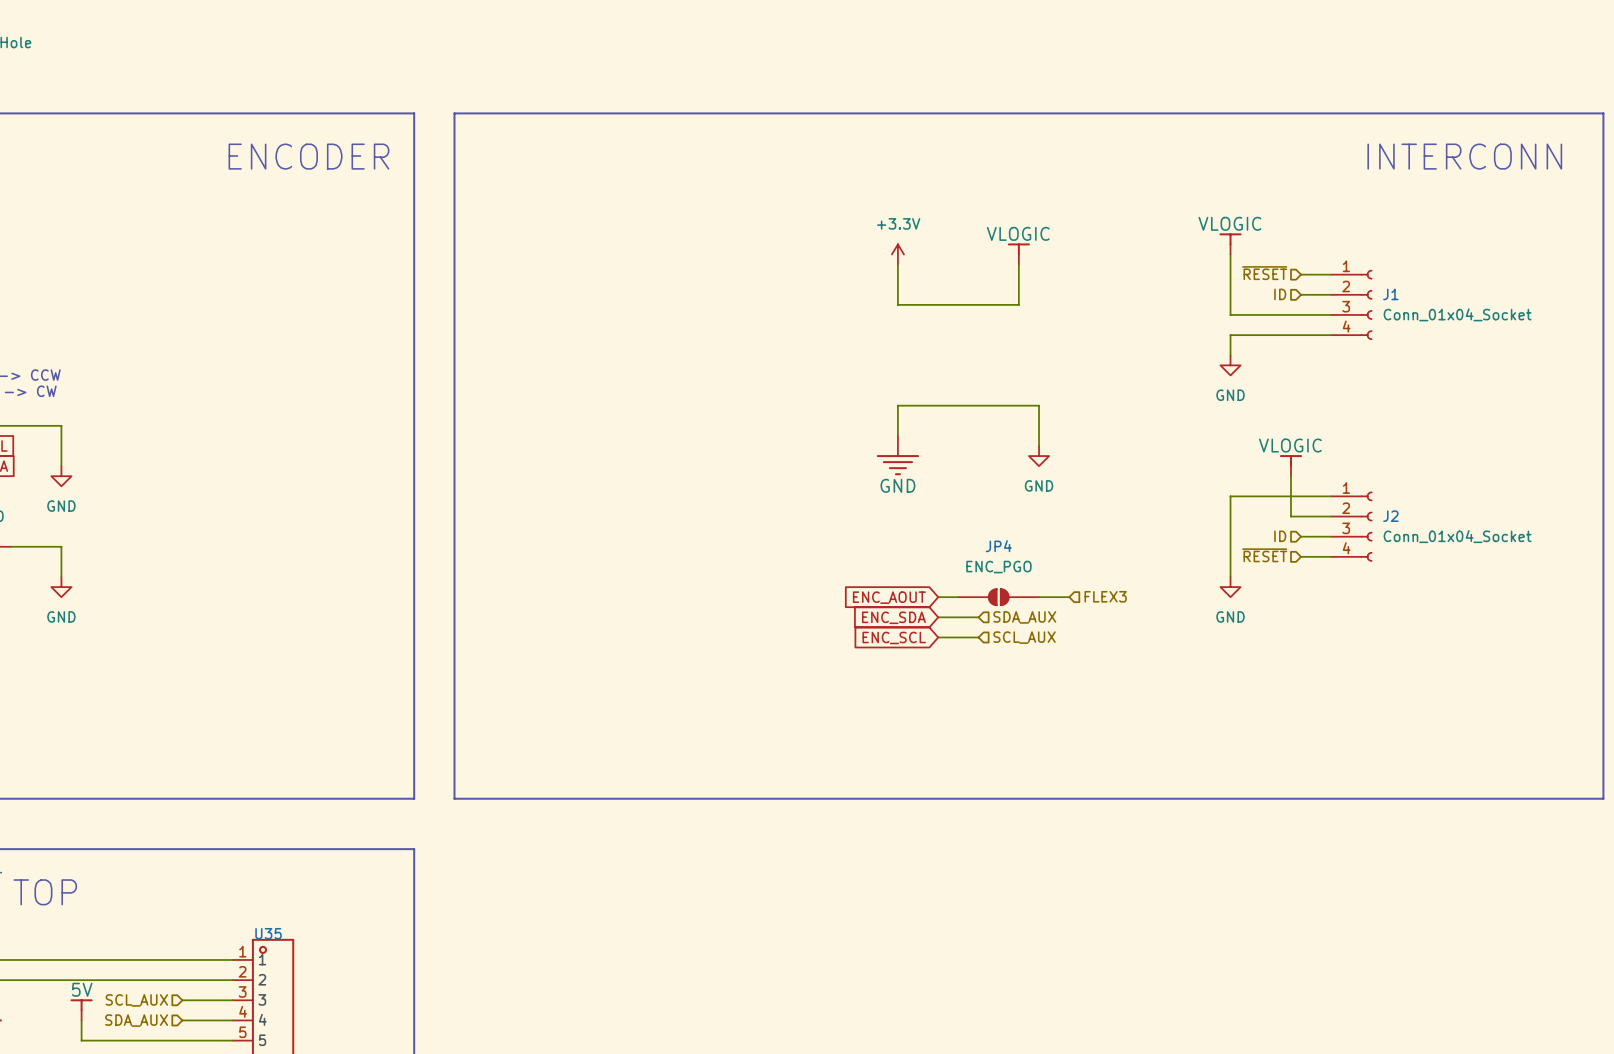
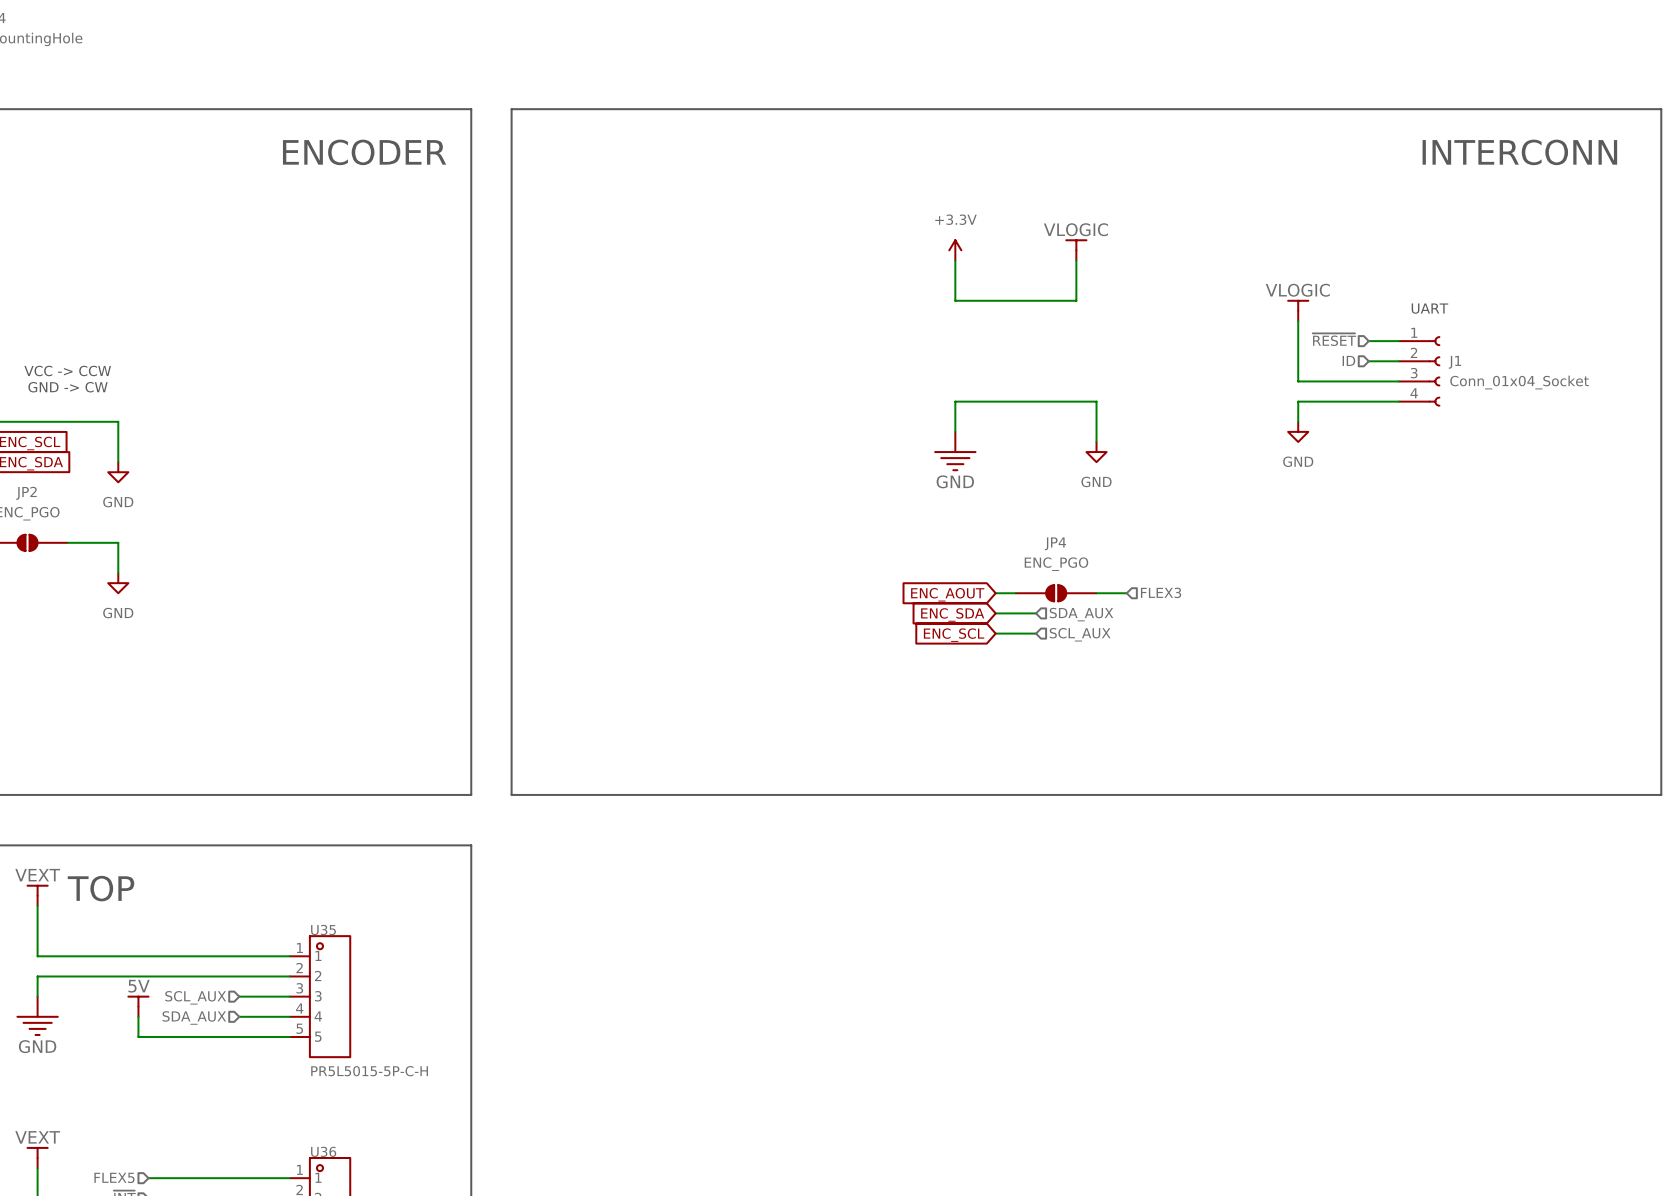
power symbol position: VLOGIC (1230, 243) -> VLOGIC (1298, 310)
wire: (1230, 254) (1230, 314) (1331, 314) -> (1298, 320) (1298, 381) (1399, 381)
hierarchical label position: ~{RESET} (1264, 273) -> ~{RESET} (1334, 339)
wire: (1301, 274) (1331, 274) -> (1368, 341) (1399, 341)
hierarchical label position: ID (1280, 294) -> ID (1348, 360)
wire: (1301, 294) (1331, 294) -> (1368, 361) (1399, 361)
J1 position: (1351, 304) -> (1419, 371)
text: none -> UART (1429, 308)
wire: (1331, 335) (1230, 335) (1230, 355) -> (1399, 401) (1298, 401) (1298, 421)
power symbol position: GND (1230, 365) -> GND (1298, 431)
power symbol: VLOGIC (1290, 465) -> none
wire: (1290, 476) (1290, 516) (1331, 516) -> none
wire: (1331, 496) (1230, 496) (1230, 577) -> none
J2: Conn_01x04_Socket (1351, 526) -> none
hierarchical label: ID (1280, 536) -> none
wire: (1301, 536) (1331, 536) -> none
hierarchical label: ~{RESET} (1264, 555) -> none
wire: (1301, 556) (1331, 556) -> none
power symbol: GND (1230, 587) -> none

